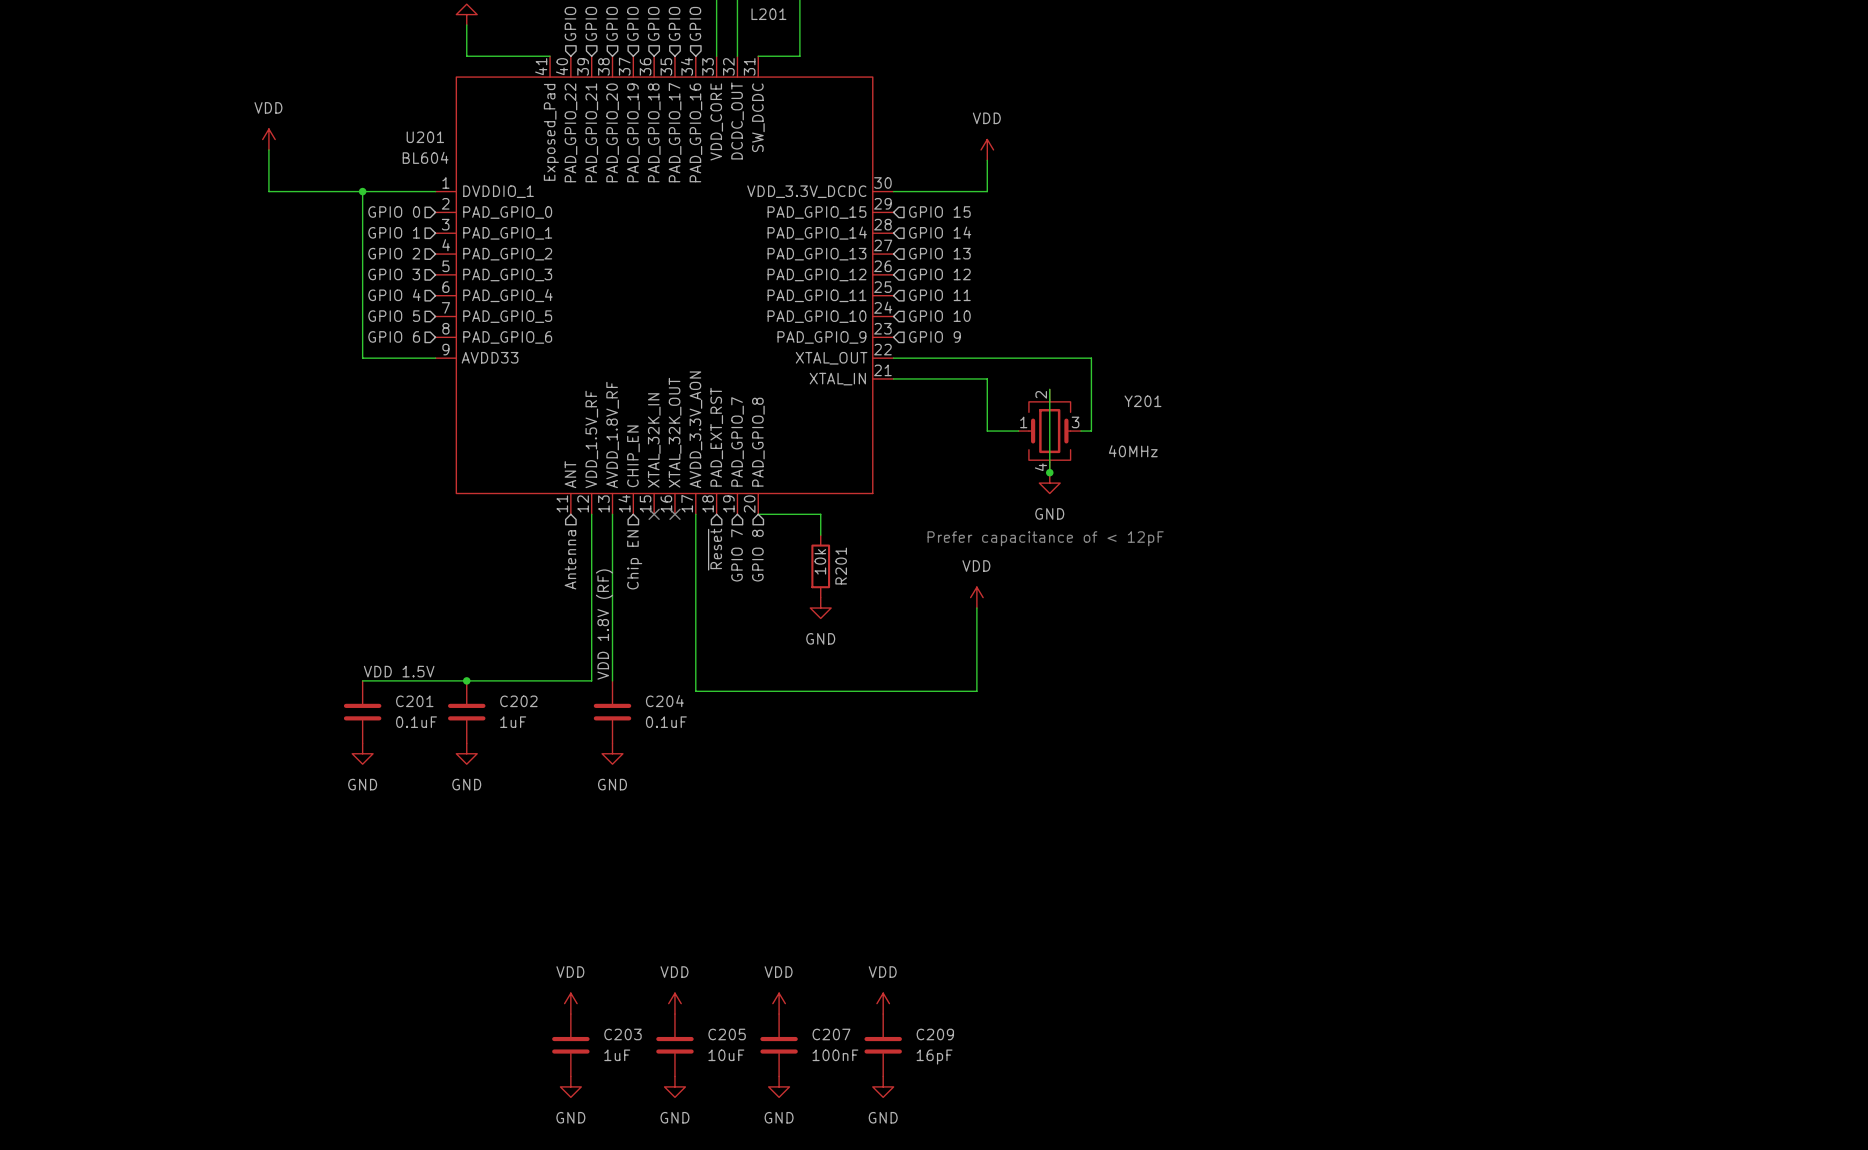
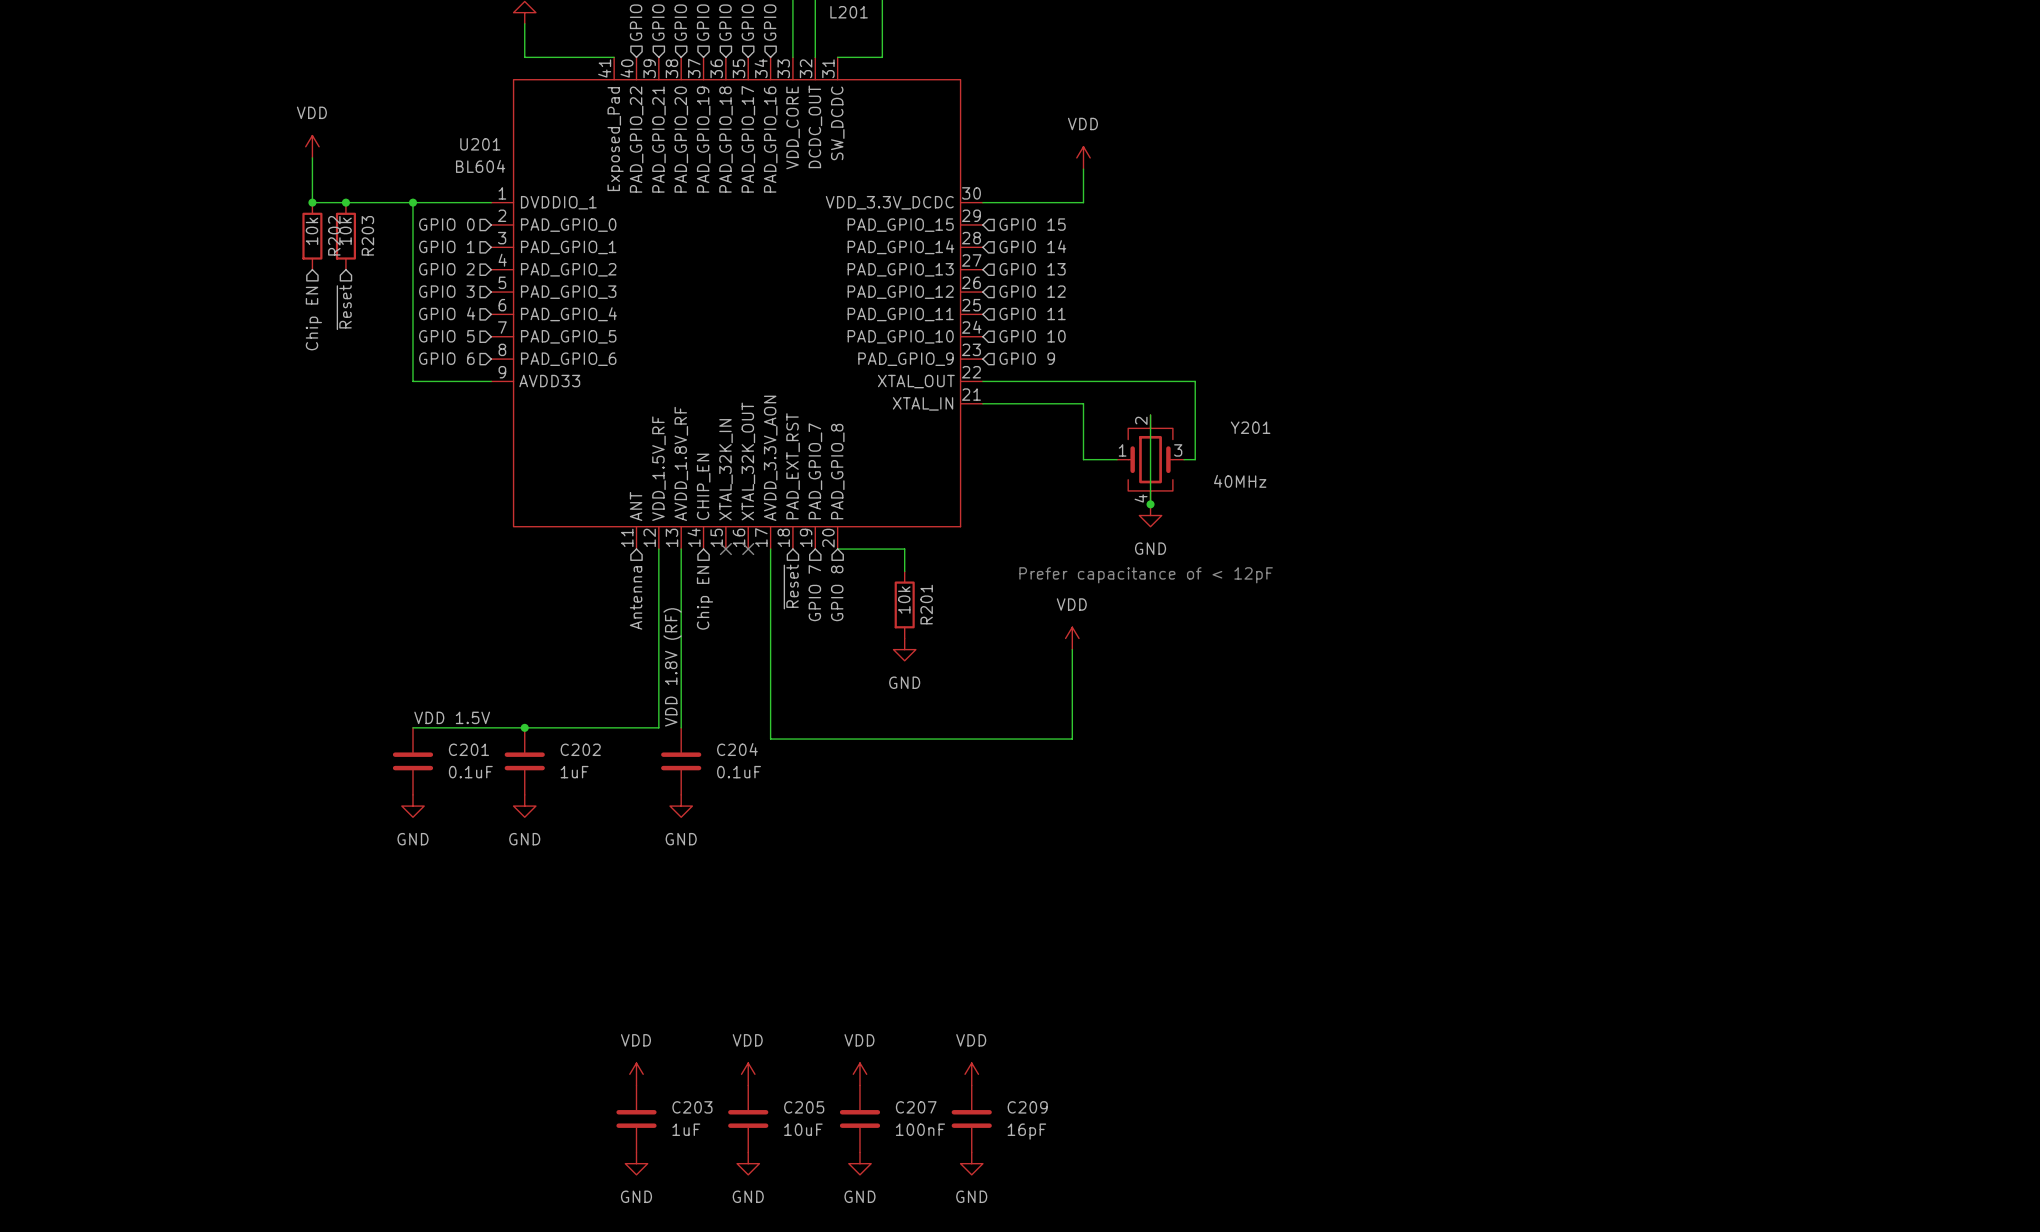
junction: none -> (312, 202)
junction: none -> (345, 202)
R202: none -> 10k (312, 236)
R203: none -> 10k (345, 236)
hierarchical label: none -> ~{Reset} (344, 307)
hierarchical label: none -> Chip EN (313, 318)

